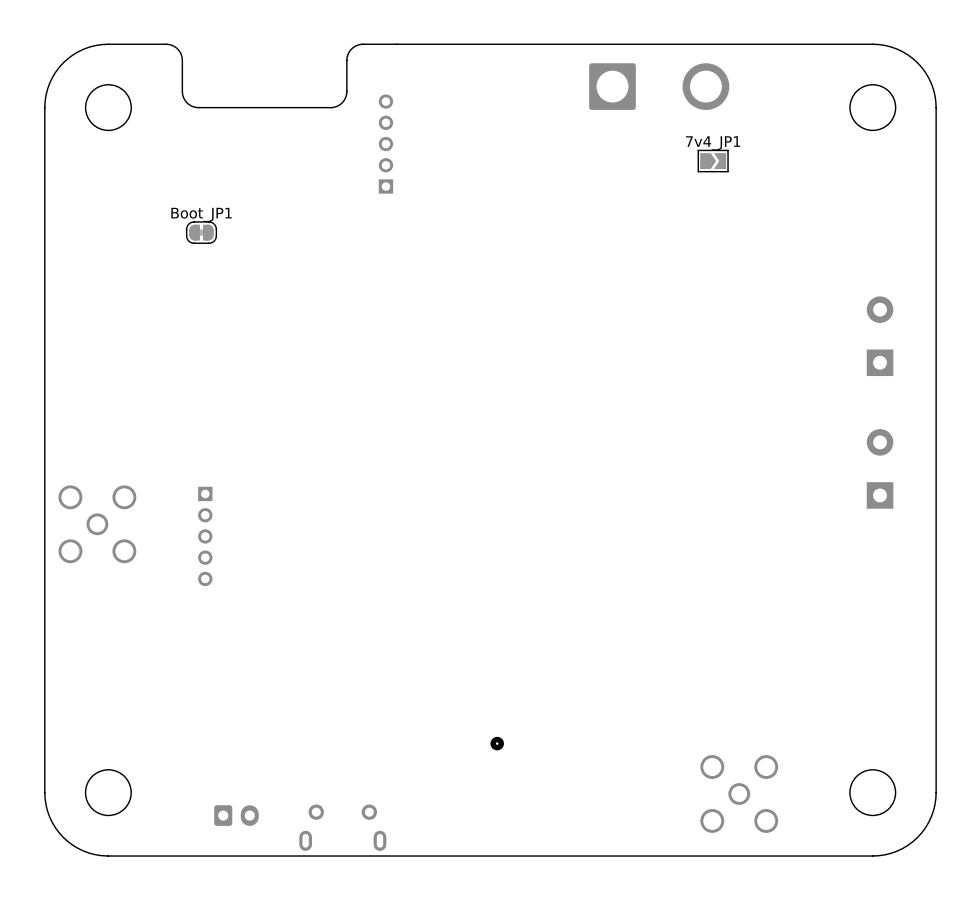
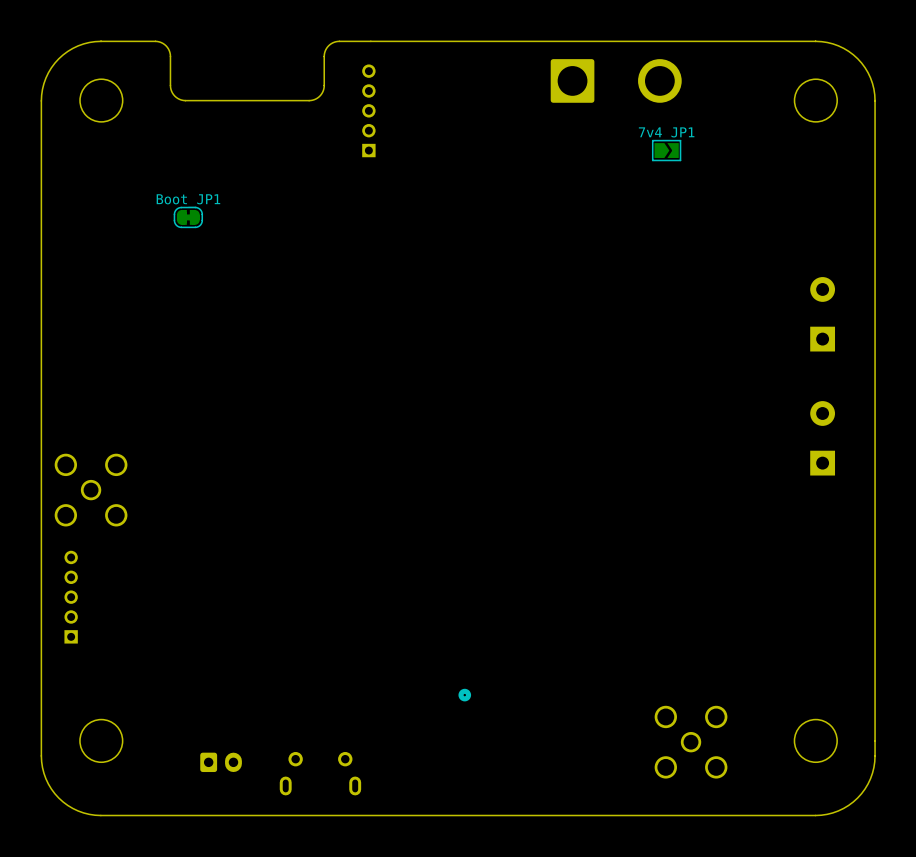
board edge: (108, 44) (83, 49) (63, 62) (49, 83) (45, 101) (44, 792) (49, 816) (55, 827) (67, 841) (89, 853) (108, 856) (878, 855) (902, 848) (917, 837) (931, 816) (936, 792) -> (101, 41) (83, 43) (63, 54) (48, 72) (41, 95) (41, 755) (42, 767) (48, 784) (63, 801) (78, 810) (100, 815) (821, 815) (843, 808) (853, 801) (865, 789) (873, 767) (875, 740)
part position: (385, 144) -> (368, 110)
part rotation: 0° (205, 536) -> 180° (71, 597)
part position: (205, 536) -> (71, 597)

